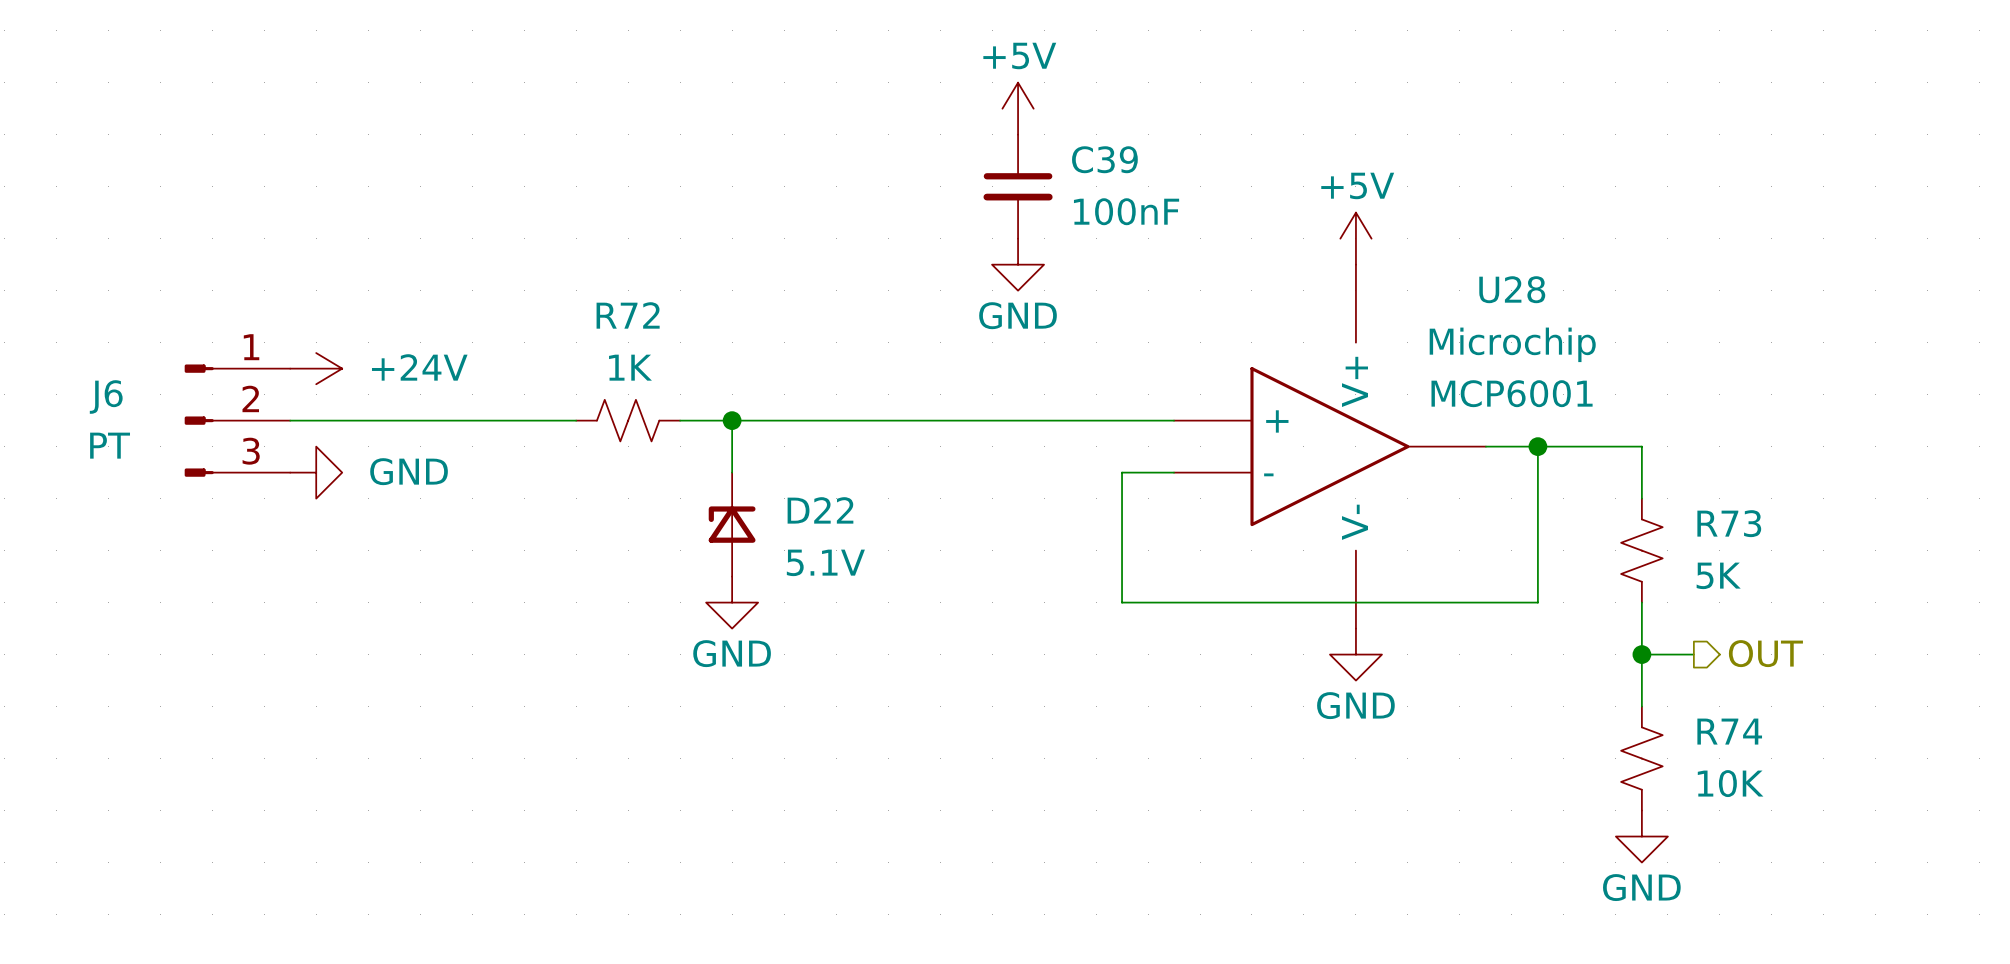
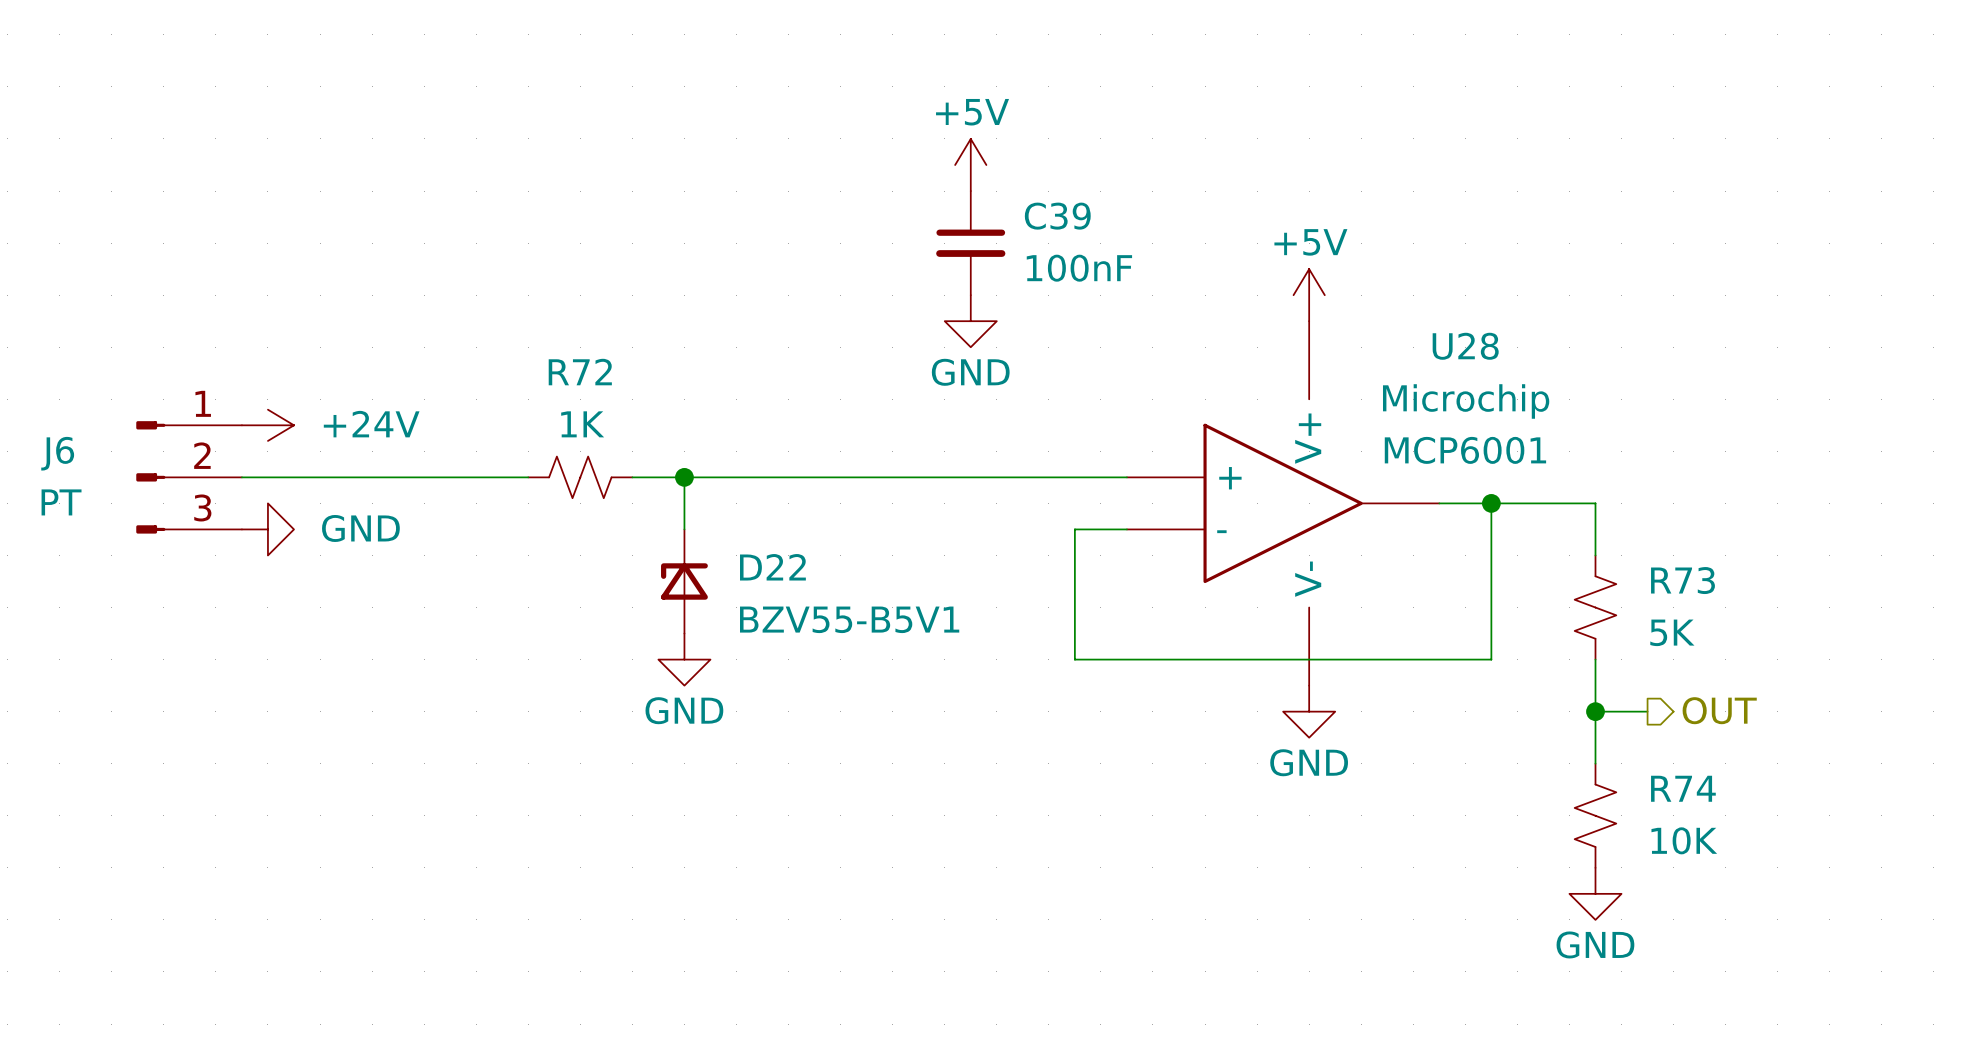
D22 value: 5.1V (825, 562) -> BZV55-B5V1 (849, 619)

